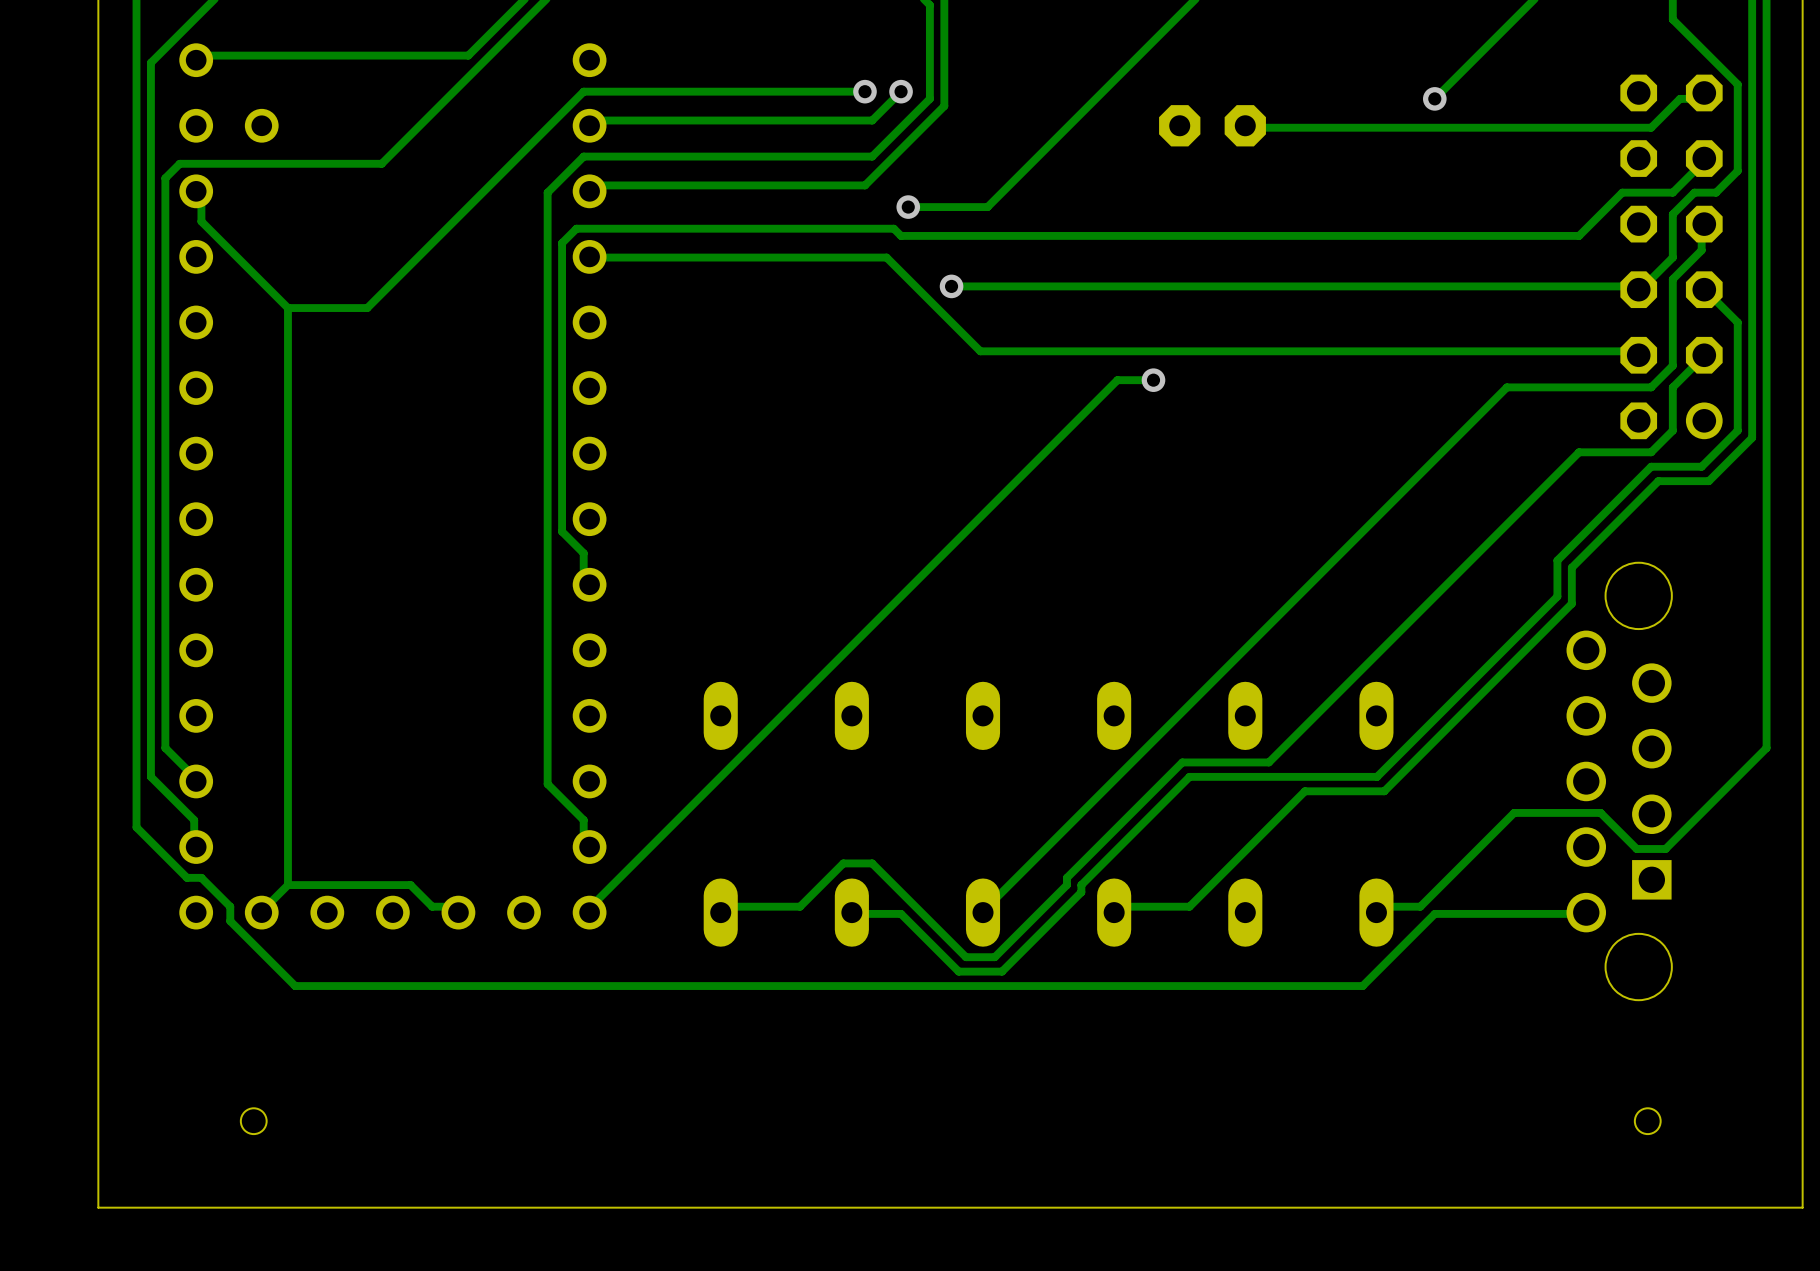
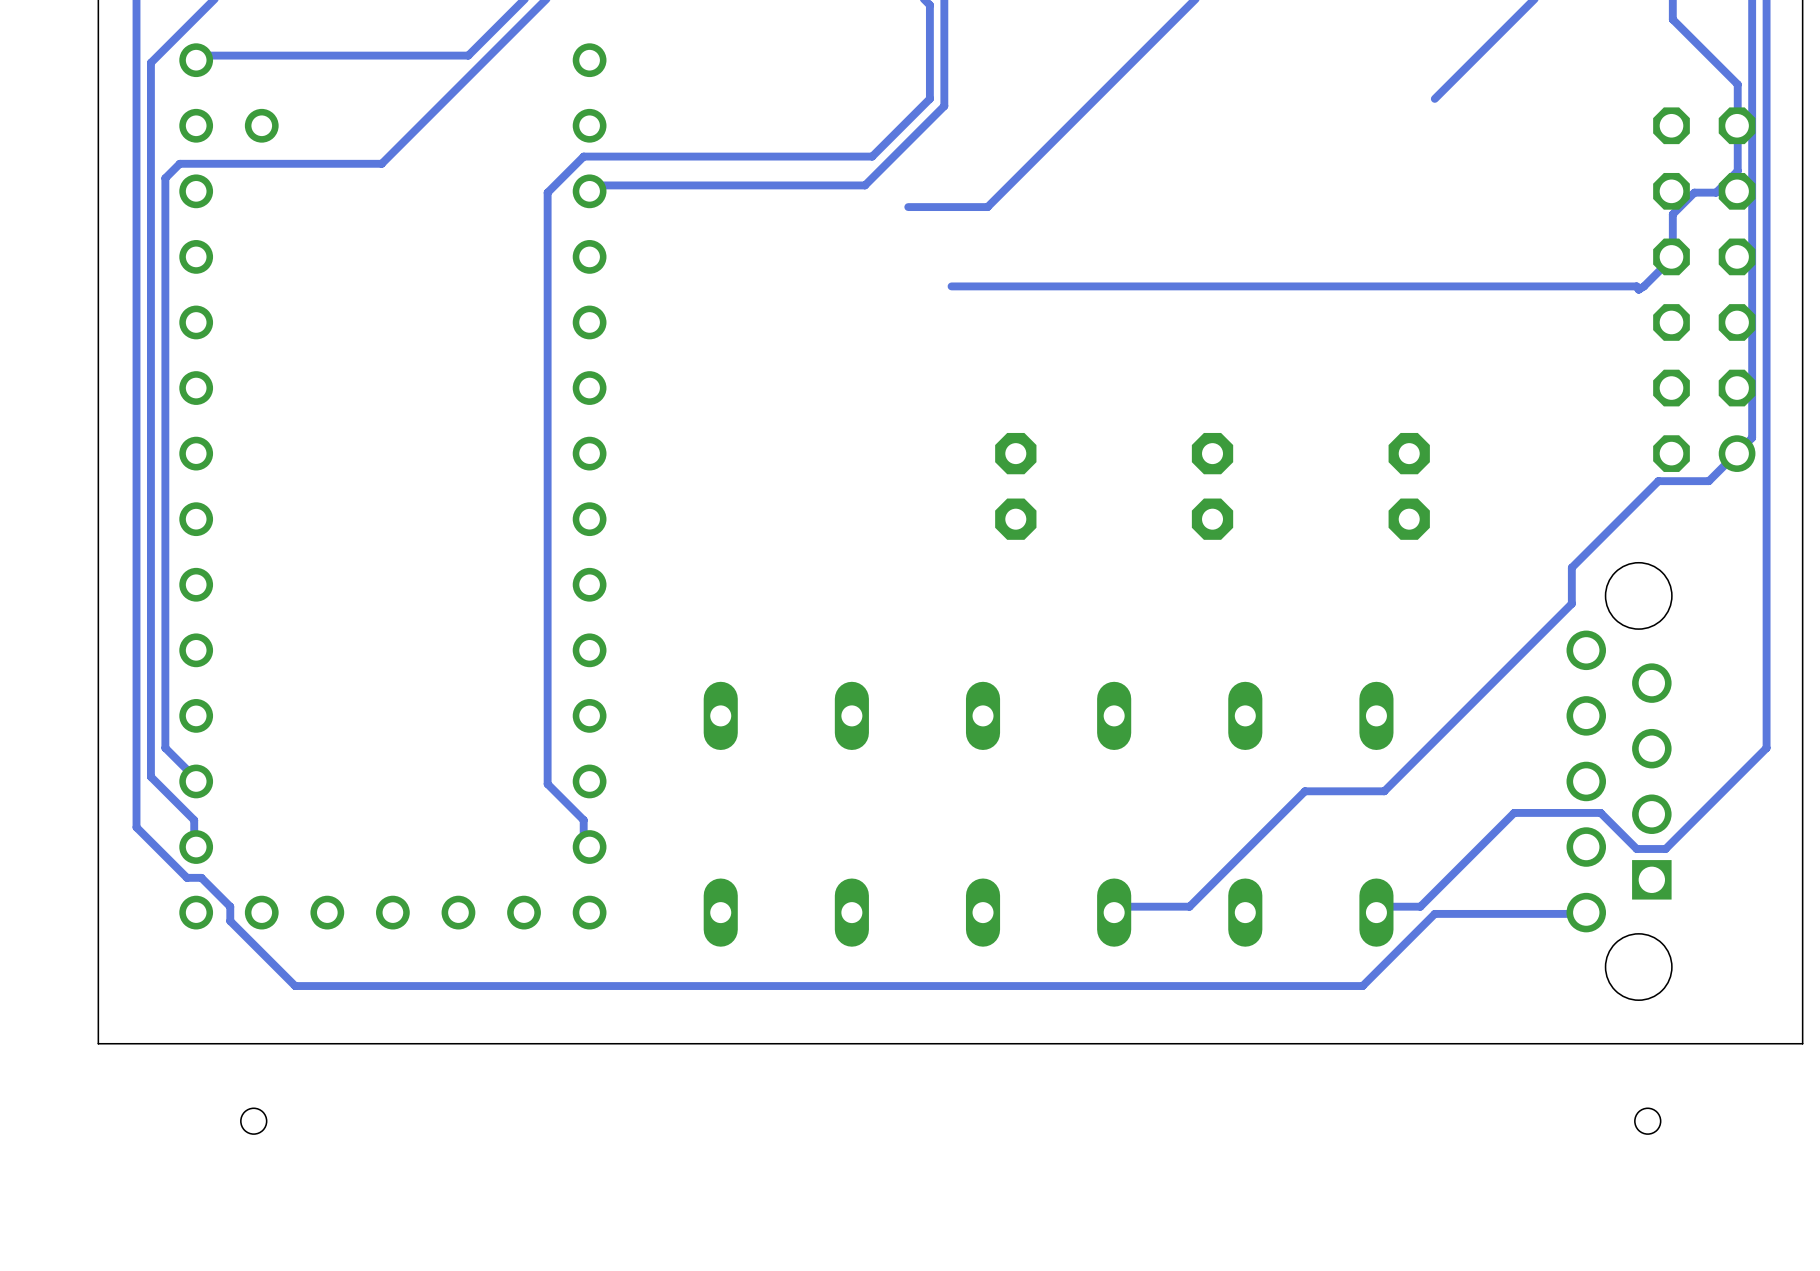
track: (864, 91) (583, 91) (367, 308) (287, 308) -> none
via: (864, 91) -> none
track: (901, 91) (872, 120) (590, 120) (589, 125) -> none
via: (901, 91) -> none
track: (1704, 92) (1701, 98) (1680, 98) (1651, 127) (1247, 127) (1245, 125) -> none
via: (1434, 98) -> none
part: (1212, 125) -> none
track: (1704, 158) (1701, 163) (1672, 192) (1622, 192) (1579, 235) (901, 235) (893, 228) (576, 228) (562, 243) (562, 531) (583, 553) (583, 582) (589, 584) -> none
track: (196, 191) (201, 192) (201, 221) (287, 308) -> none
via: (908, 207) -> none
track: (1704, 224) (1701, 228) (1701, 250) (1672, 279) (1672, 365) (1651, 387) (1506, 387) (983, 912) -> none
track: (589, 256) (886, 257) (980, 351) (1636, 351) (1638, 355) -> none
part position: (1671, 256) -> (1704, 289)
via: (951, 286) -> none
track: (1704, 289) (1737, 322) (1737, 430) (1701, 466) (1651, 466) (1557, 560) (1557, 596) (1377, 776) (1189, 776) (1081, 885) (1081, 892) (1002, 971) (958, 971) (901, 913) (851, 912) -> none
track: (287, 308) (287, 885) -> none
track: (1704, 355) (1672, 387) (1672, 430) (1651, 452) (1579, 452) (1268, 762) (1182, 762) (1066, 877) (1066, 885) (994, 957) (965, 957) (872, 863) (843, 863) (800, 906) (720, 906) (720, 912) -> none
track: (1153, 380) (1117, 380) (590, 906) (589, 912) -> none
via: (1153, 380) -> none
part: none -> (1015, 486)
part: none -> (1212, 486)
part: none -> (1409, 486)
track: (287, 885) (410, 885) (432, 906) (453, 906) (458, 912) -> none
track: (287, 885) (261, 912) -> none
board edge: (1802, 1043) (1802, 1207) (98, 1207) (98, 1043) -> (1802, 1043) (98, 1043)

